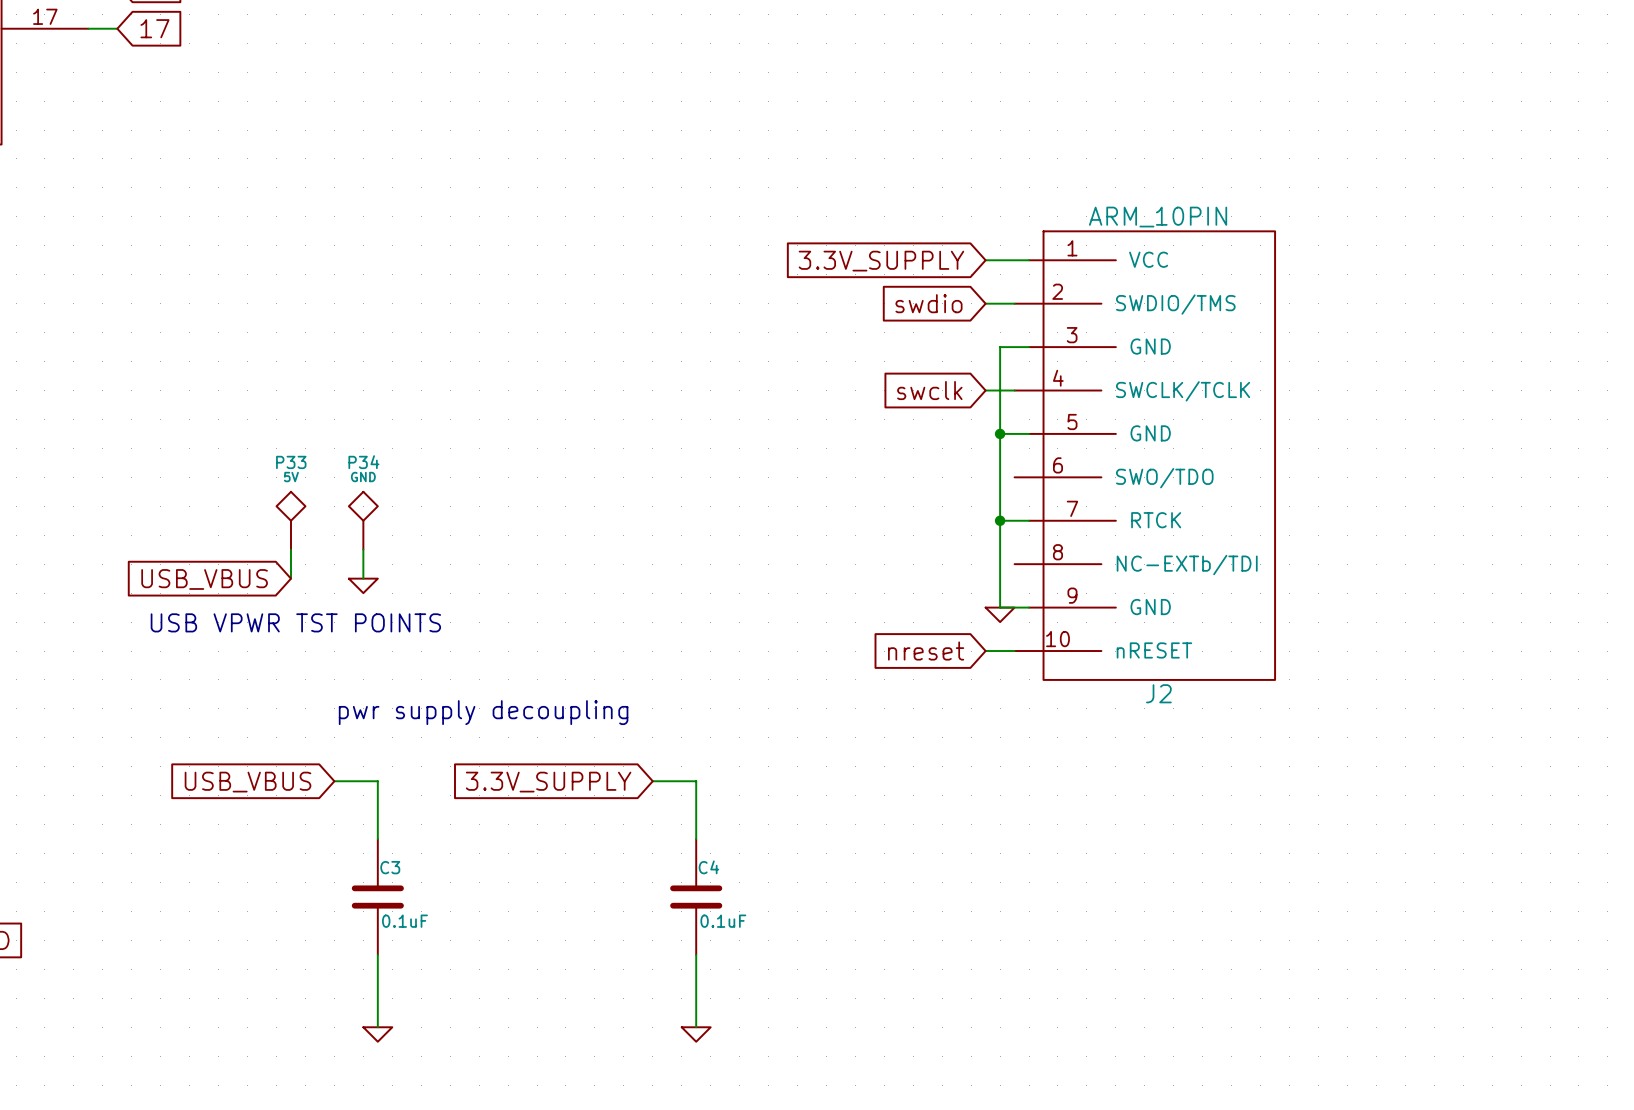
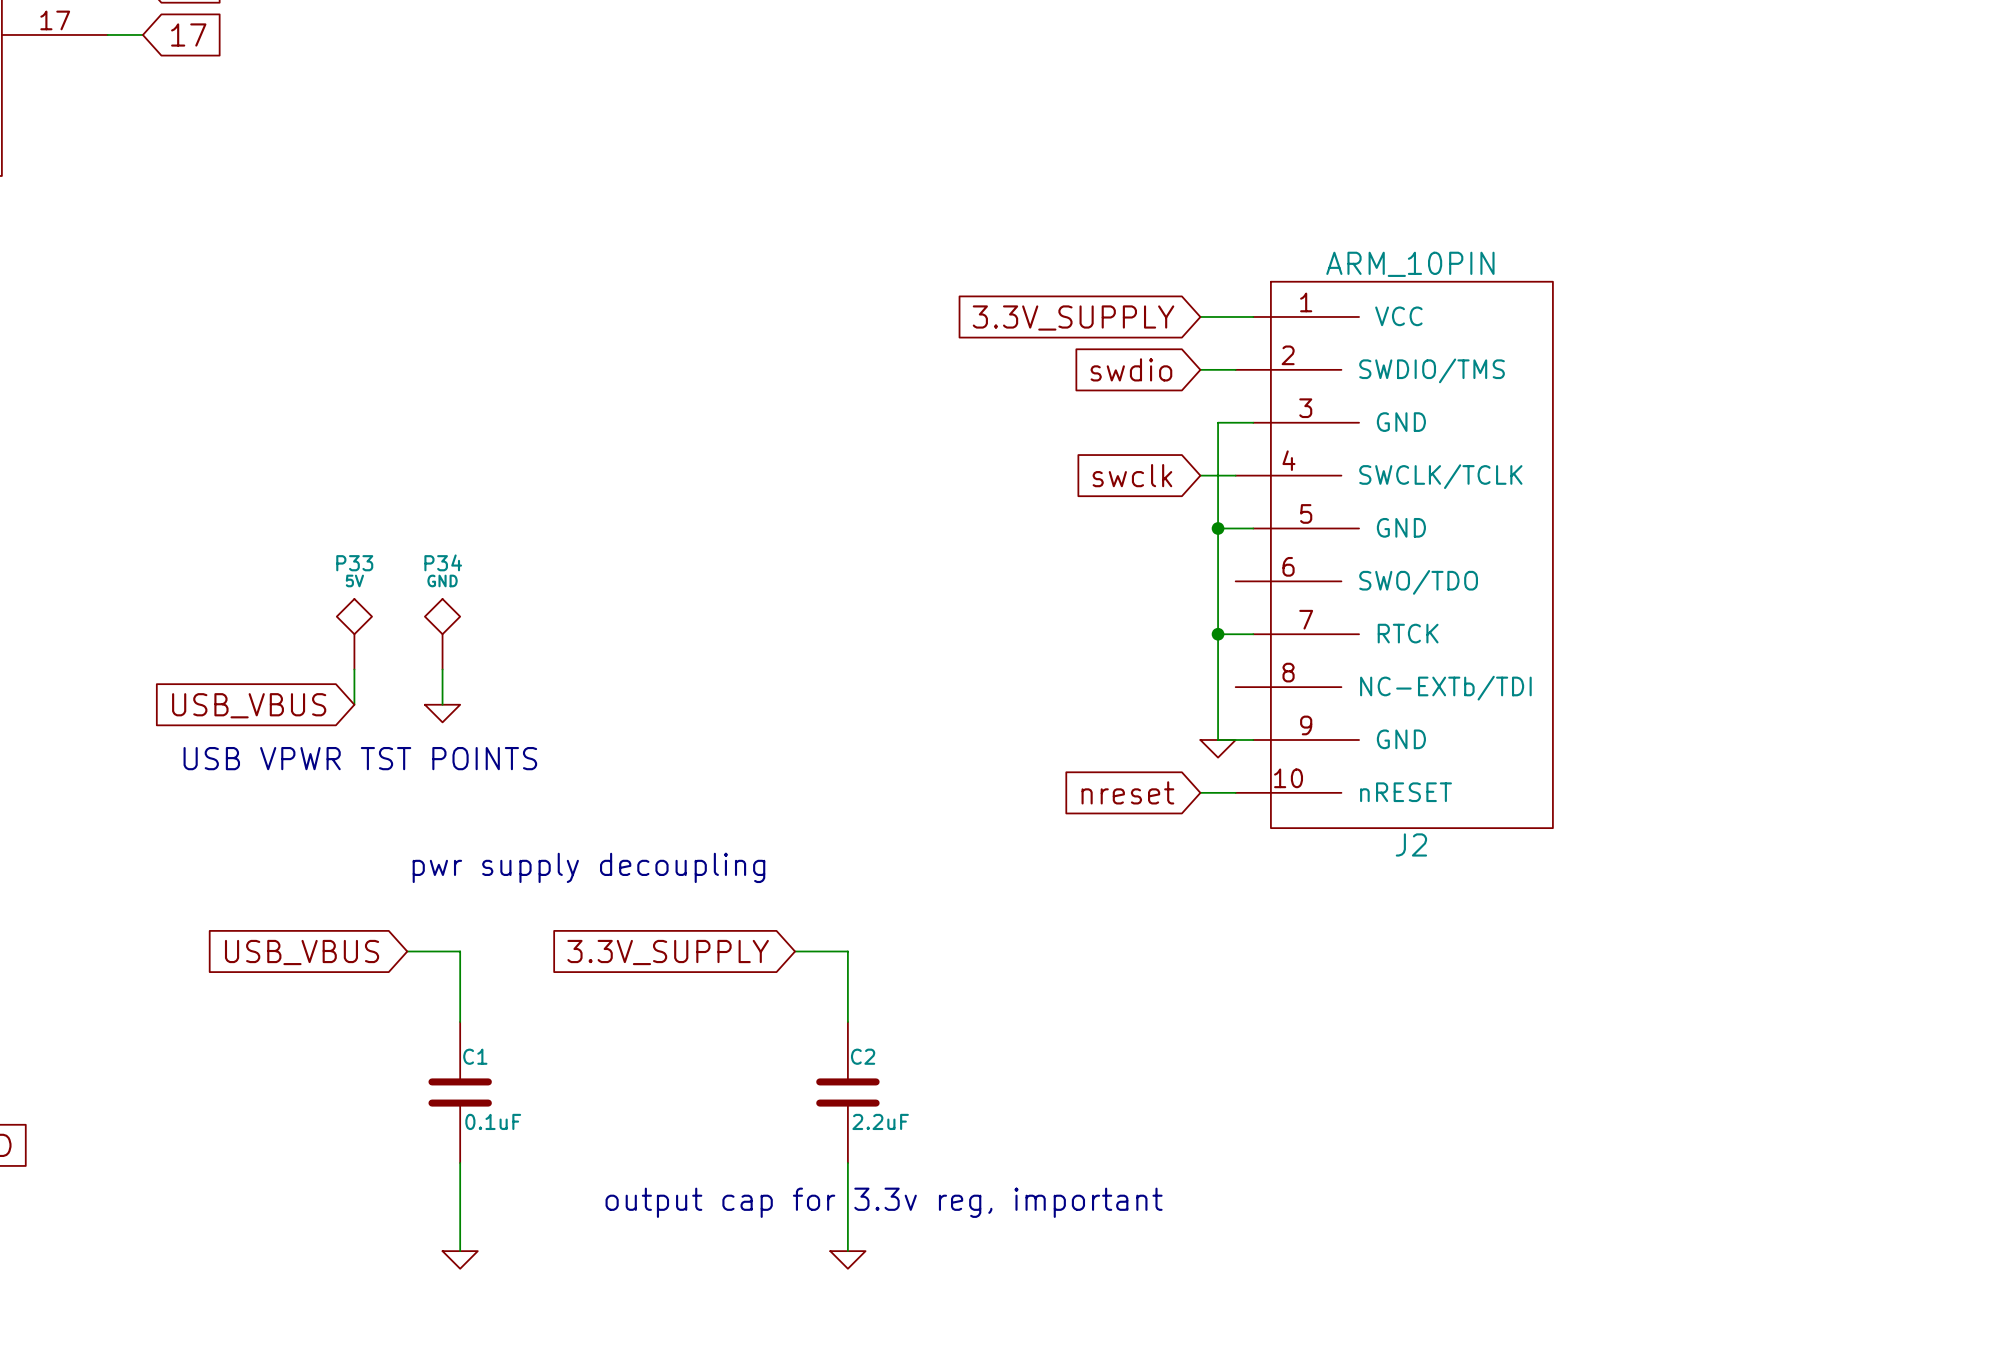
C3 name: C3 (390, 867) -> C1 (475, 1056)
C4 name: C4 (708, 867) -> C2 (863, 1056)
C4 value: 0.1uF (723, 921) -> 2.2uF (880, 1121)
text: none -> output cap for 3.3v reg, important (884, 1202)

